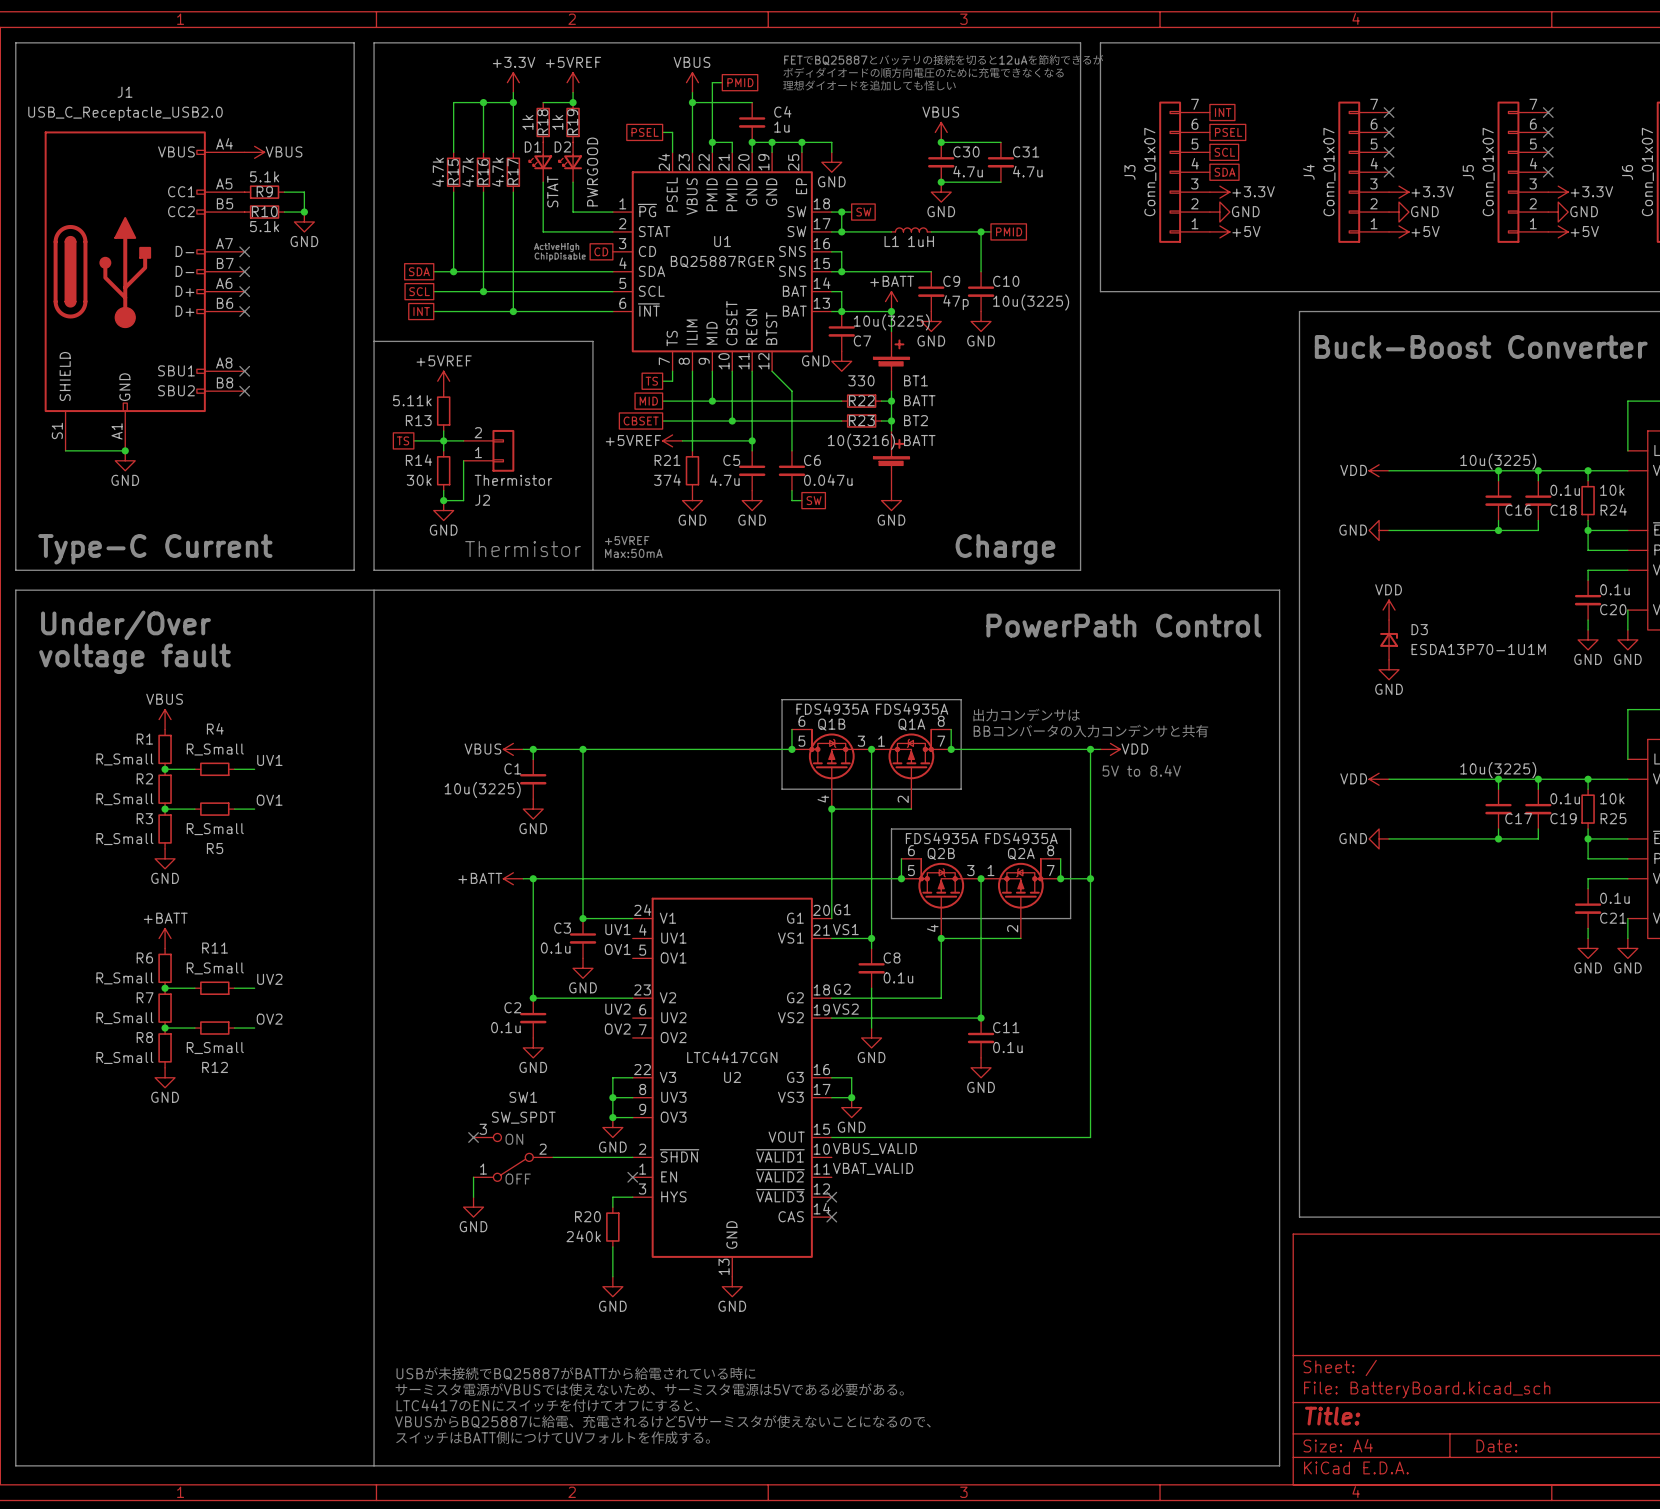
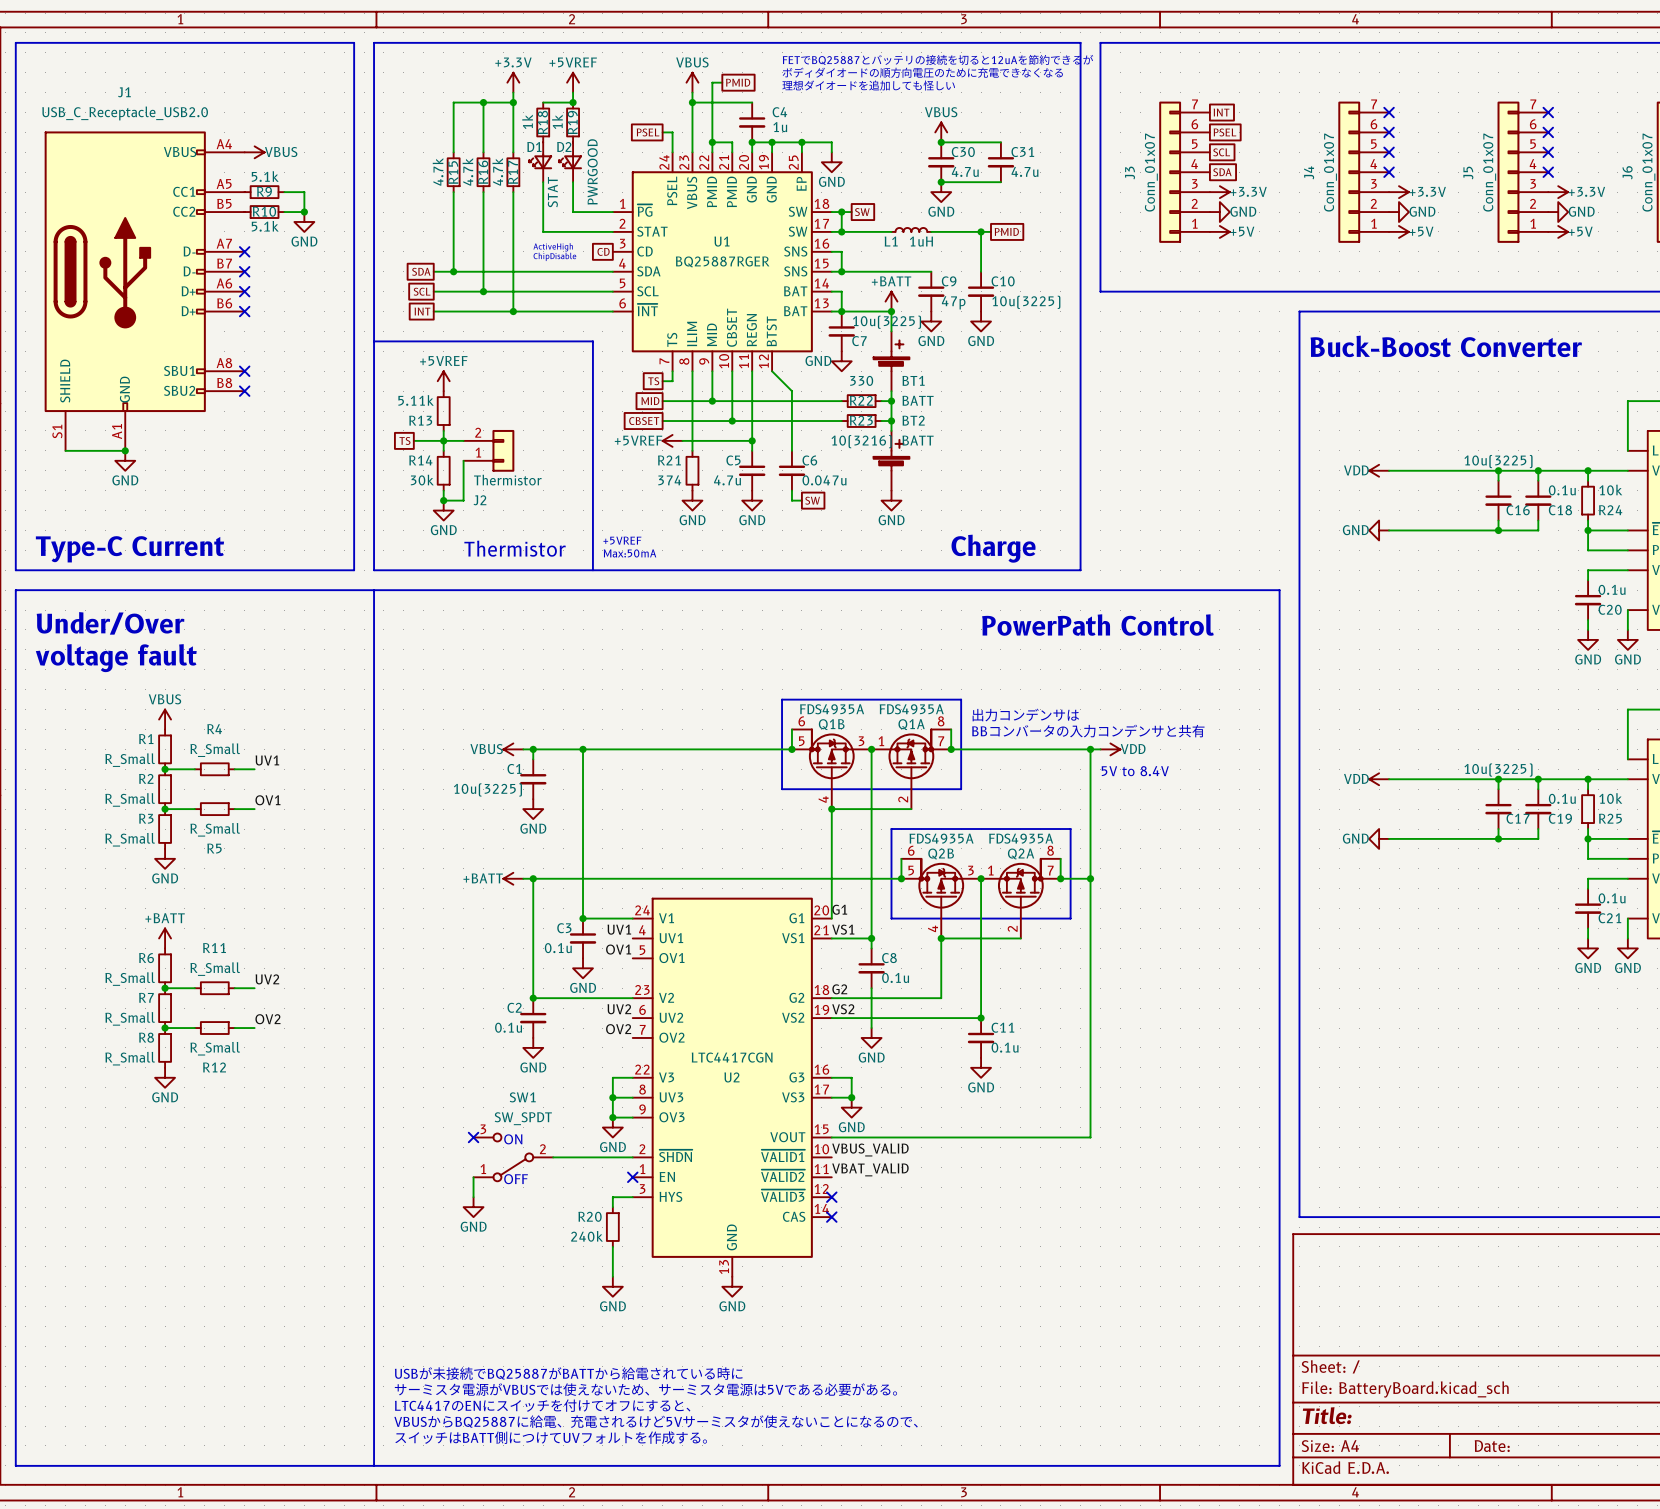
power symbol: VDD (1389, 610) -> none
D3: ESDA13P70-1U1M (1389, 639) -> none
power symbol: GND (1389, 669) -> none

